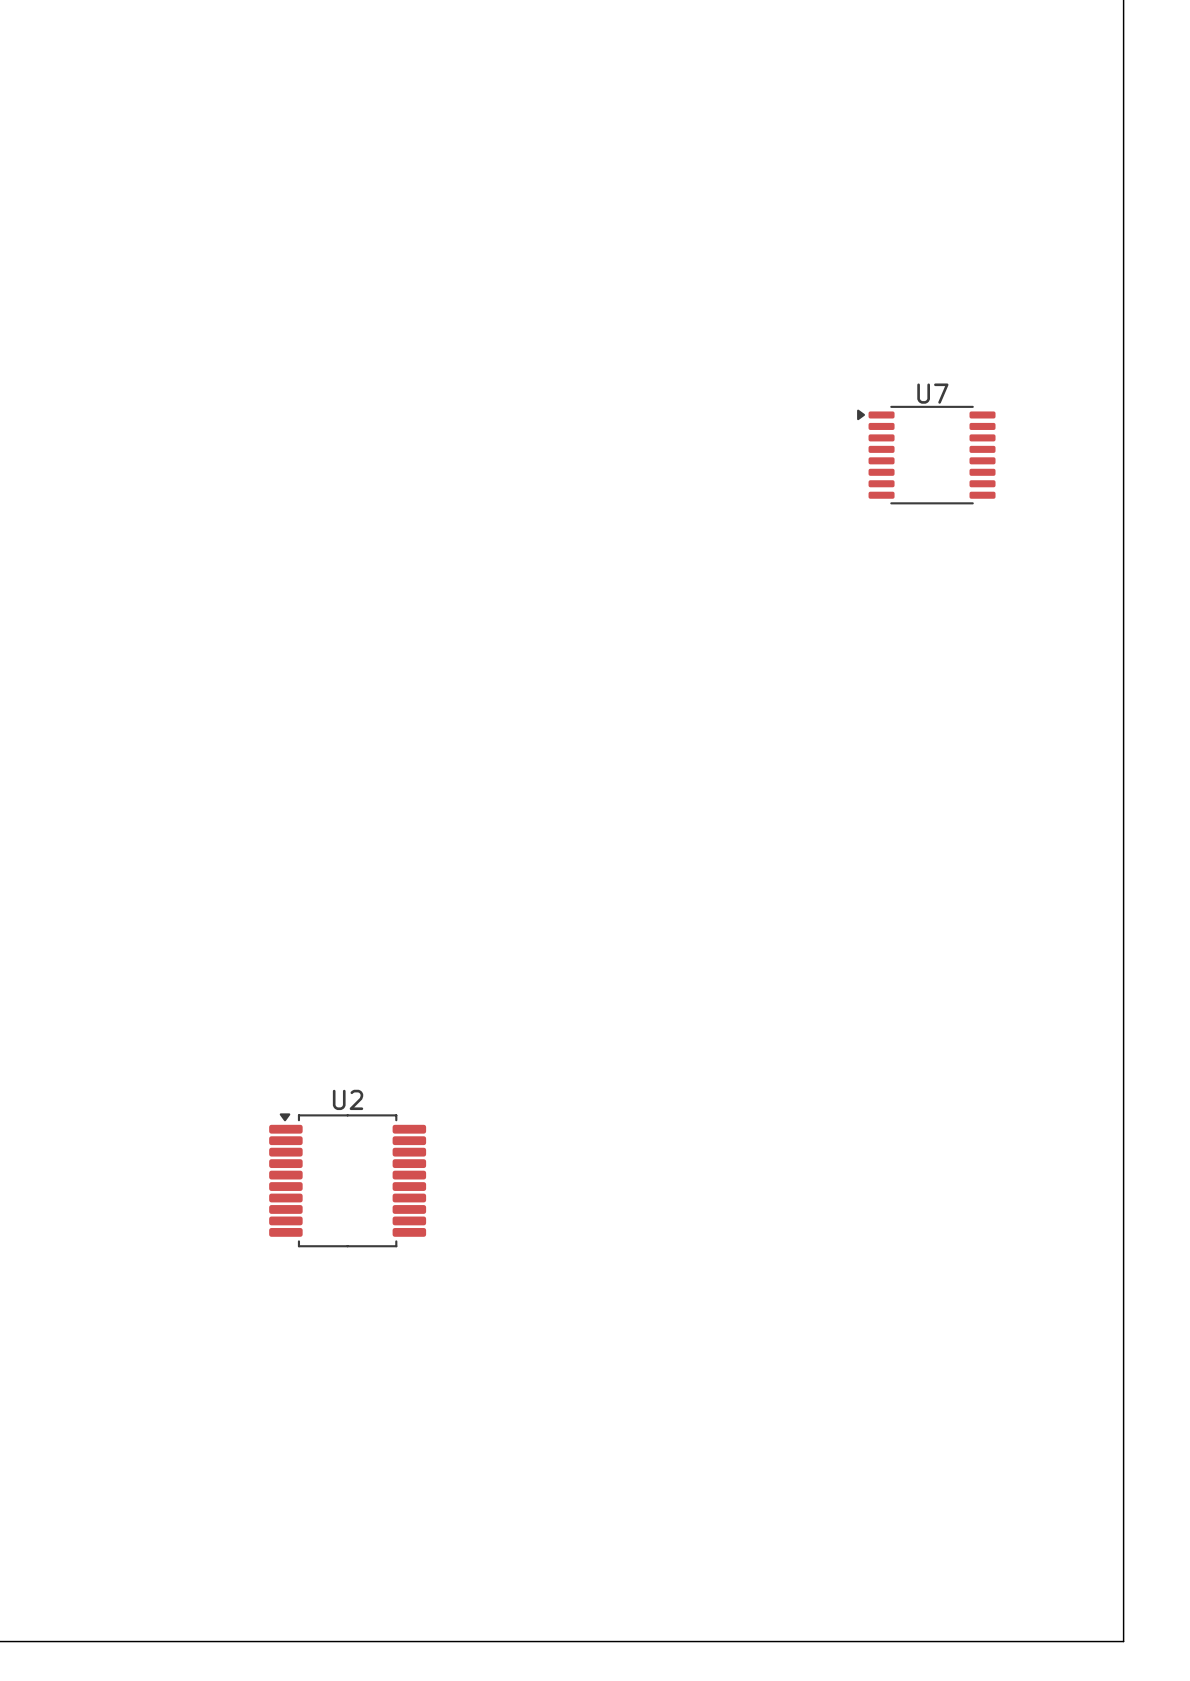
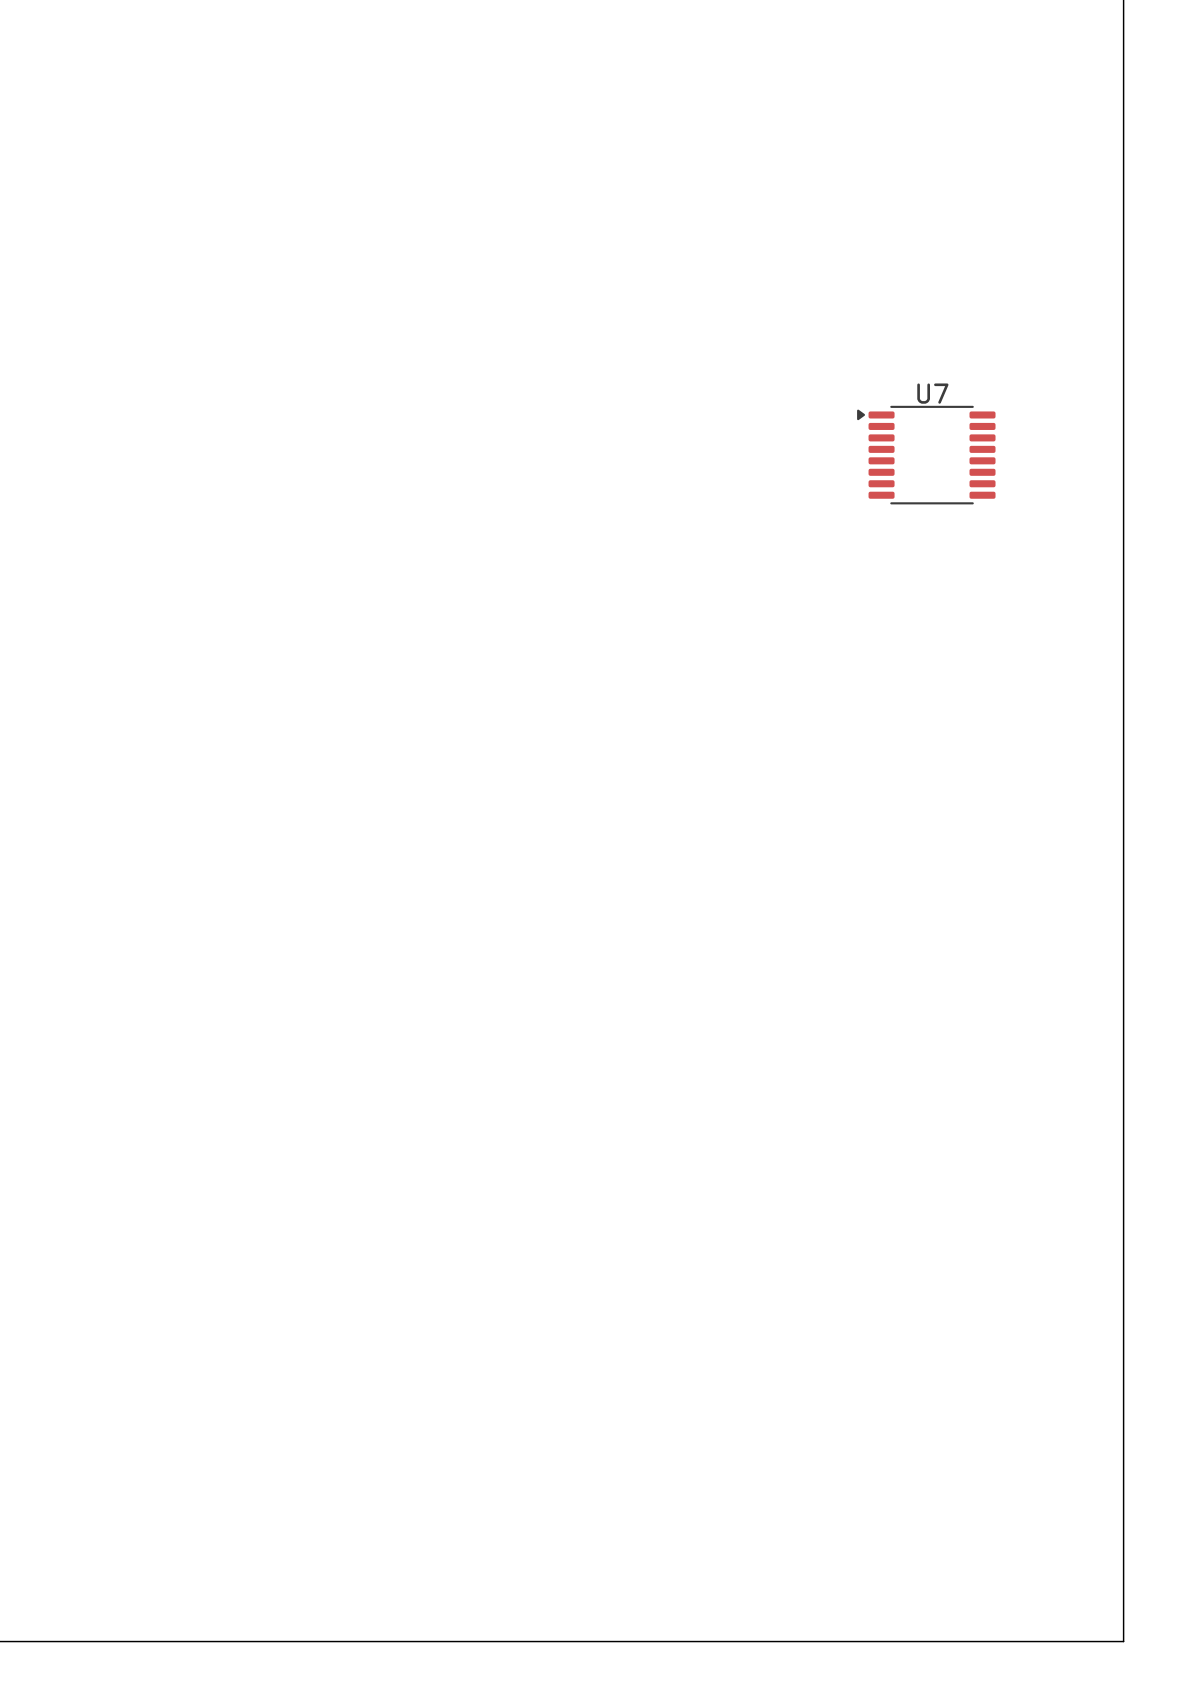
U2: (347, 1180) -> none

